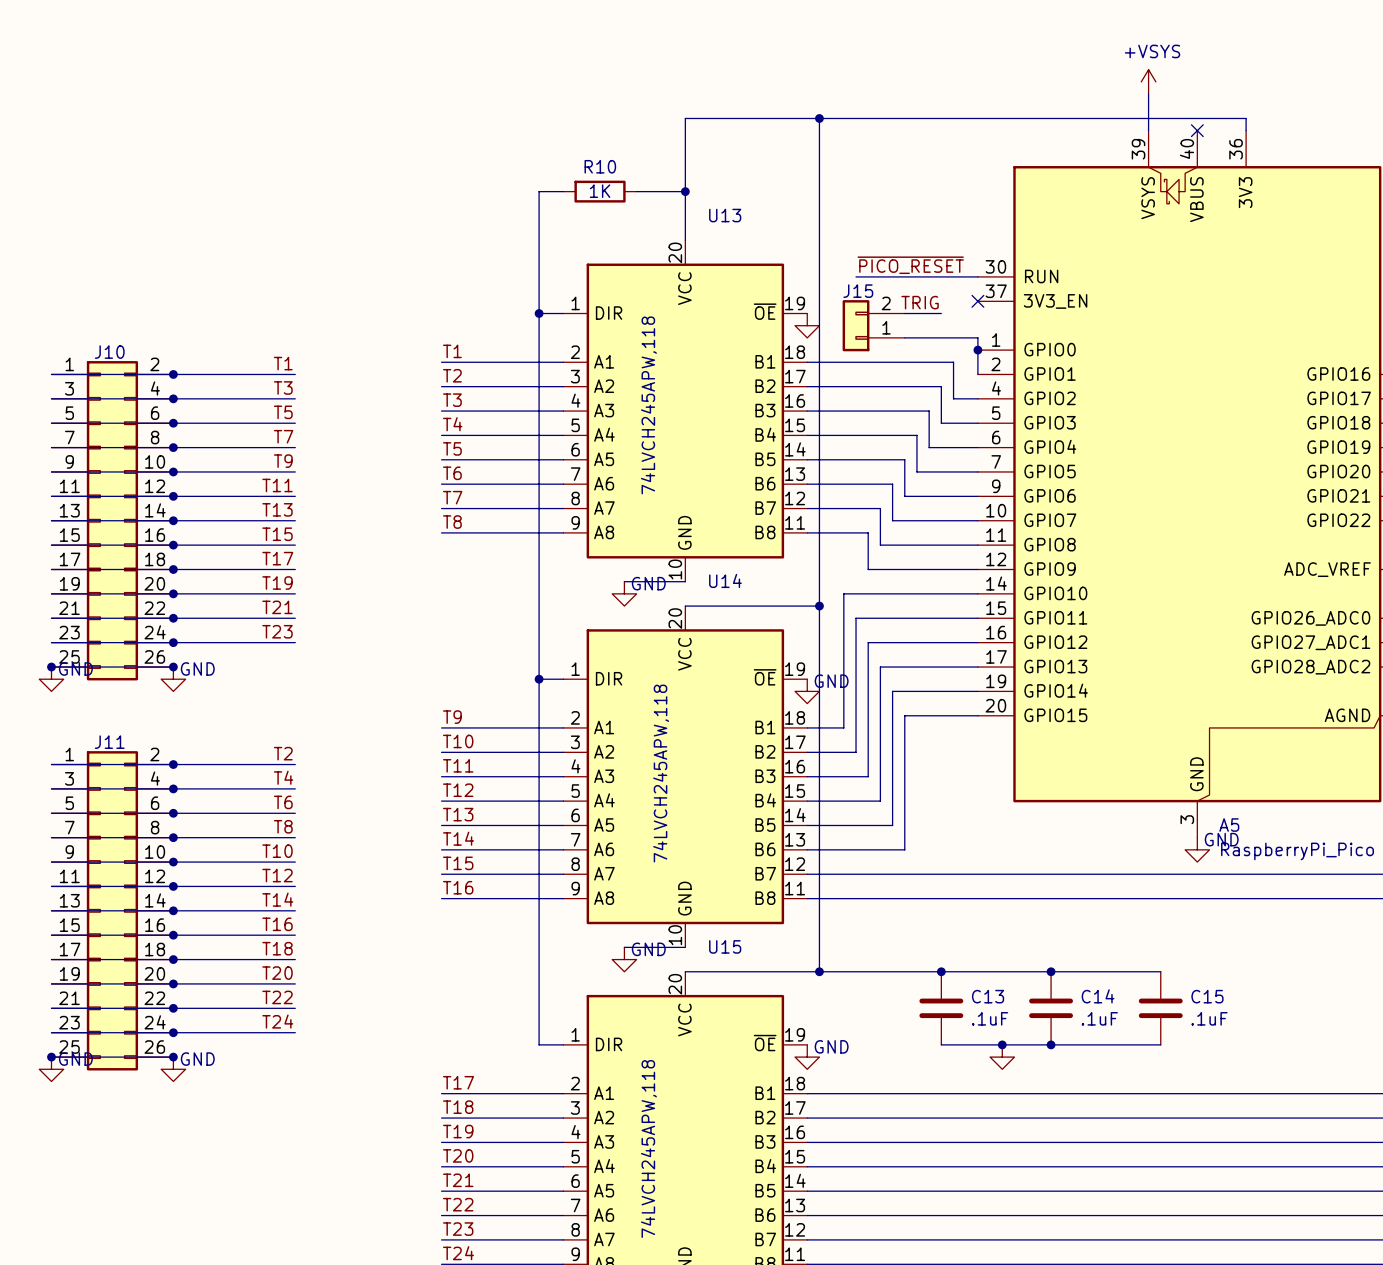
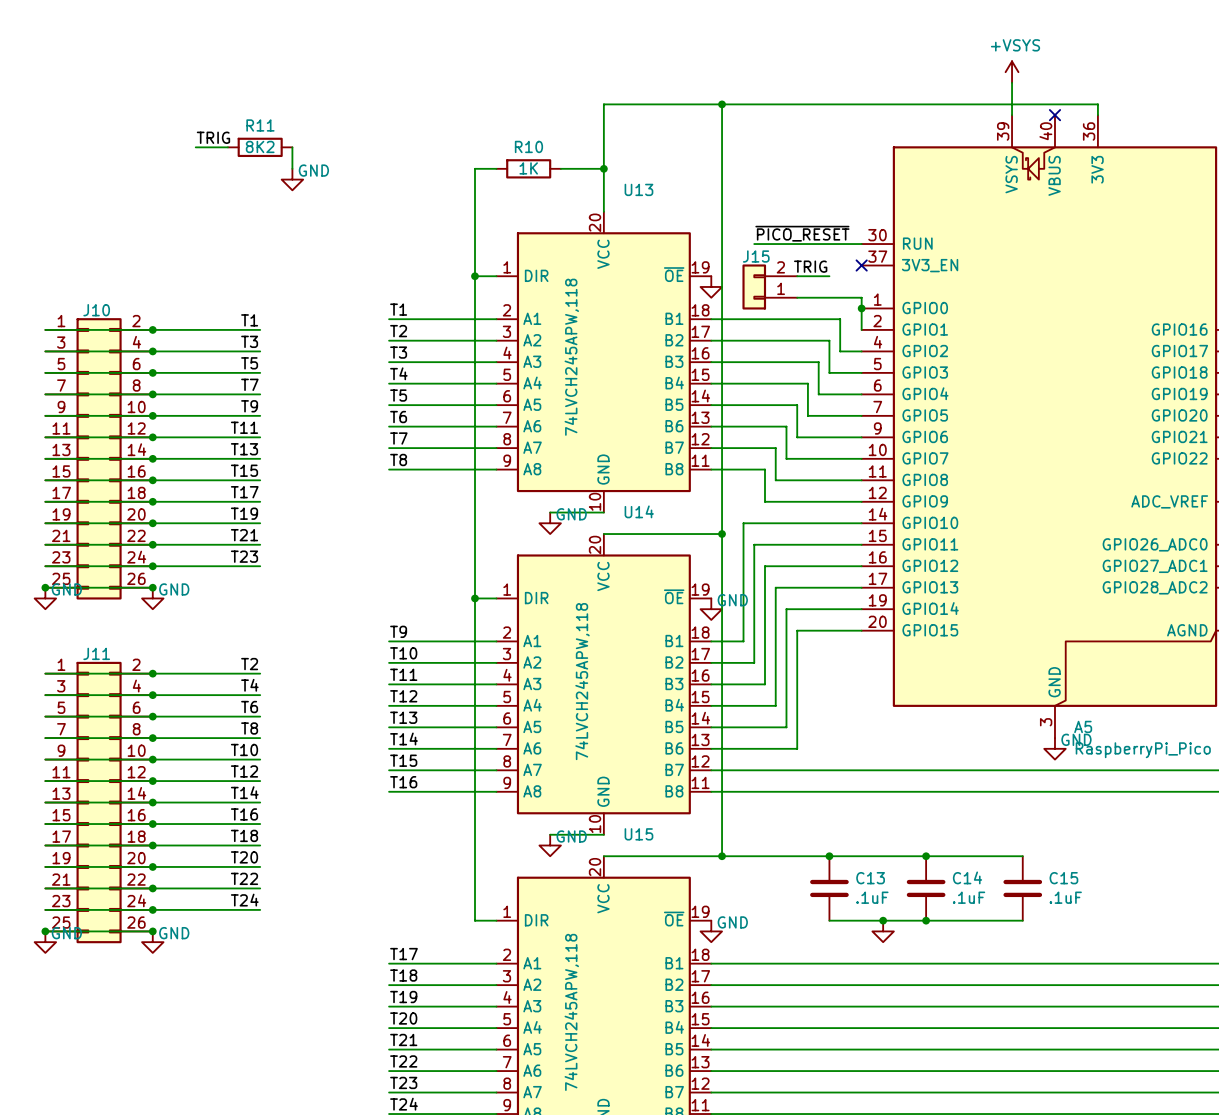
label: none -> TRIG (213, 137)
wire: none -> (195, 147) (227, 147)
R11: none -> 8K2 (260, 147)
wire: none -> (292, 147) (292, 168)
power symbol: none -> GND (292, 179)

